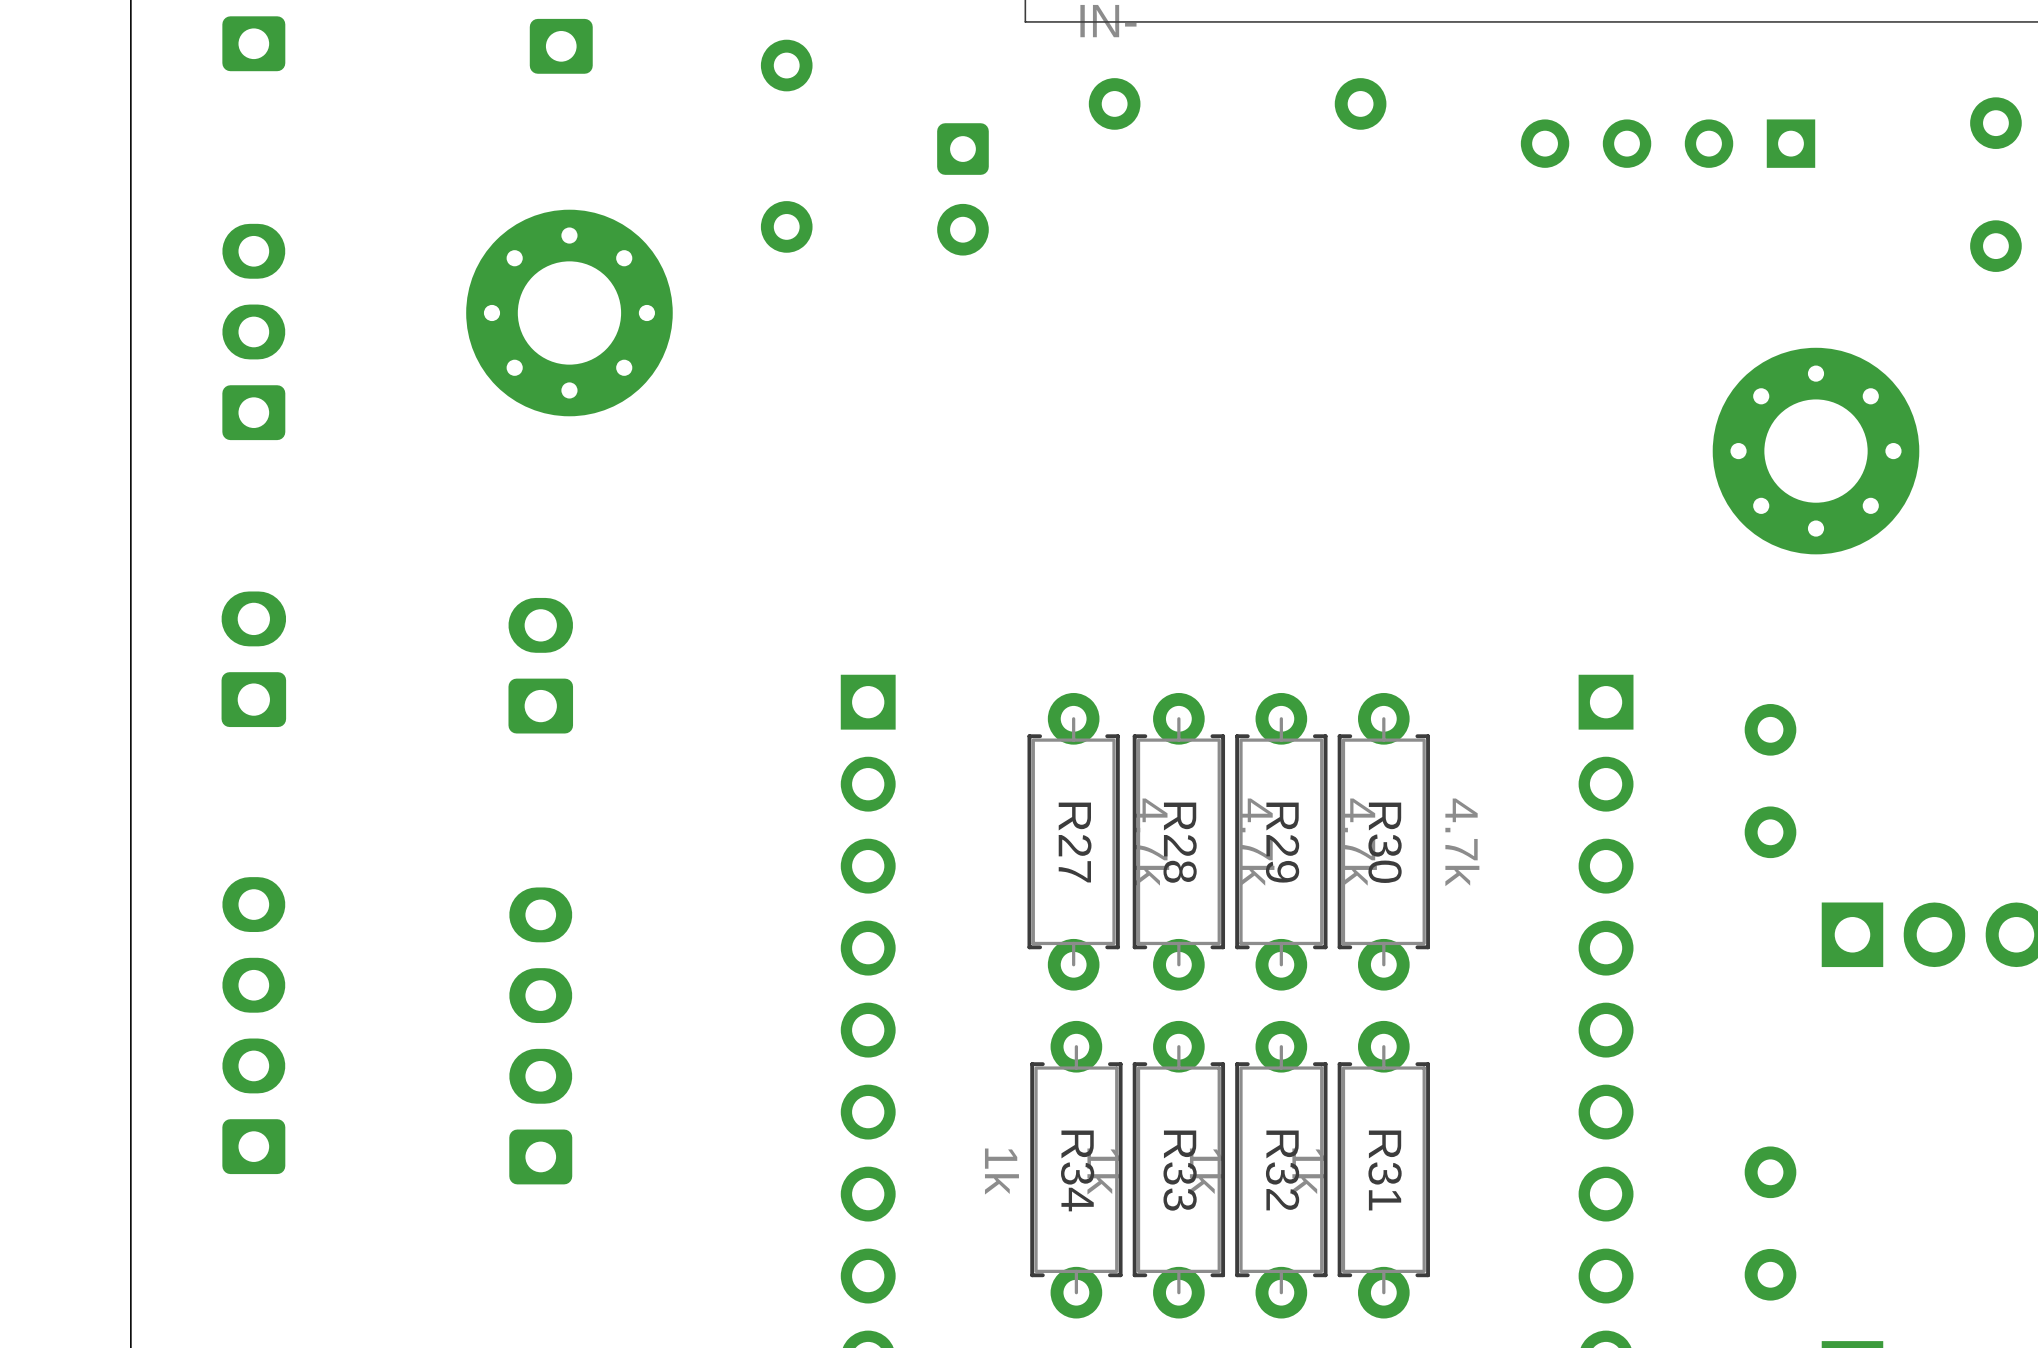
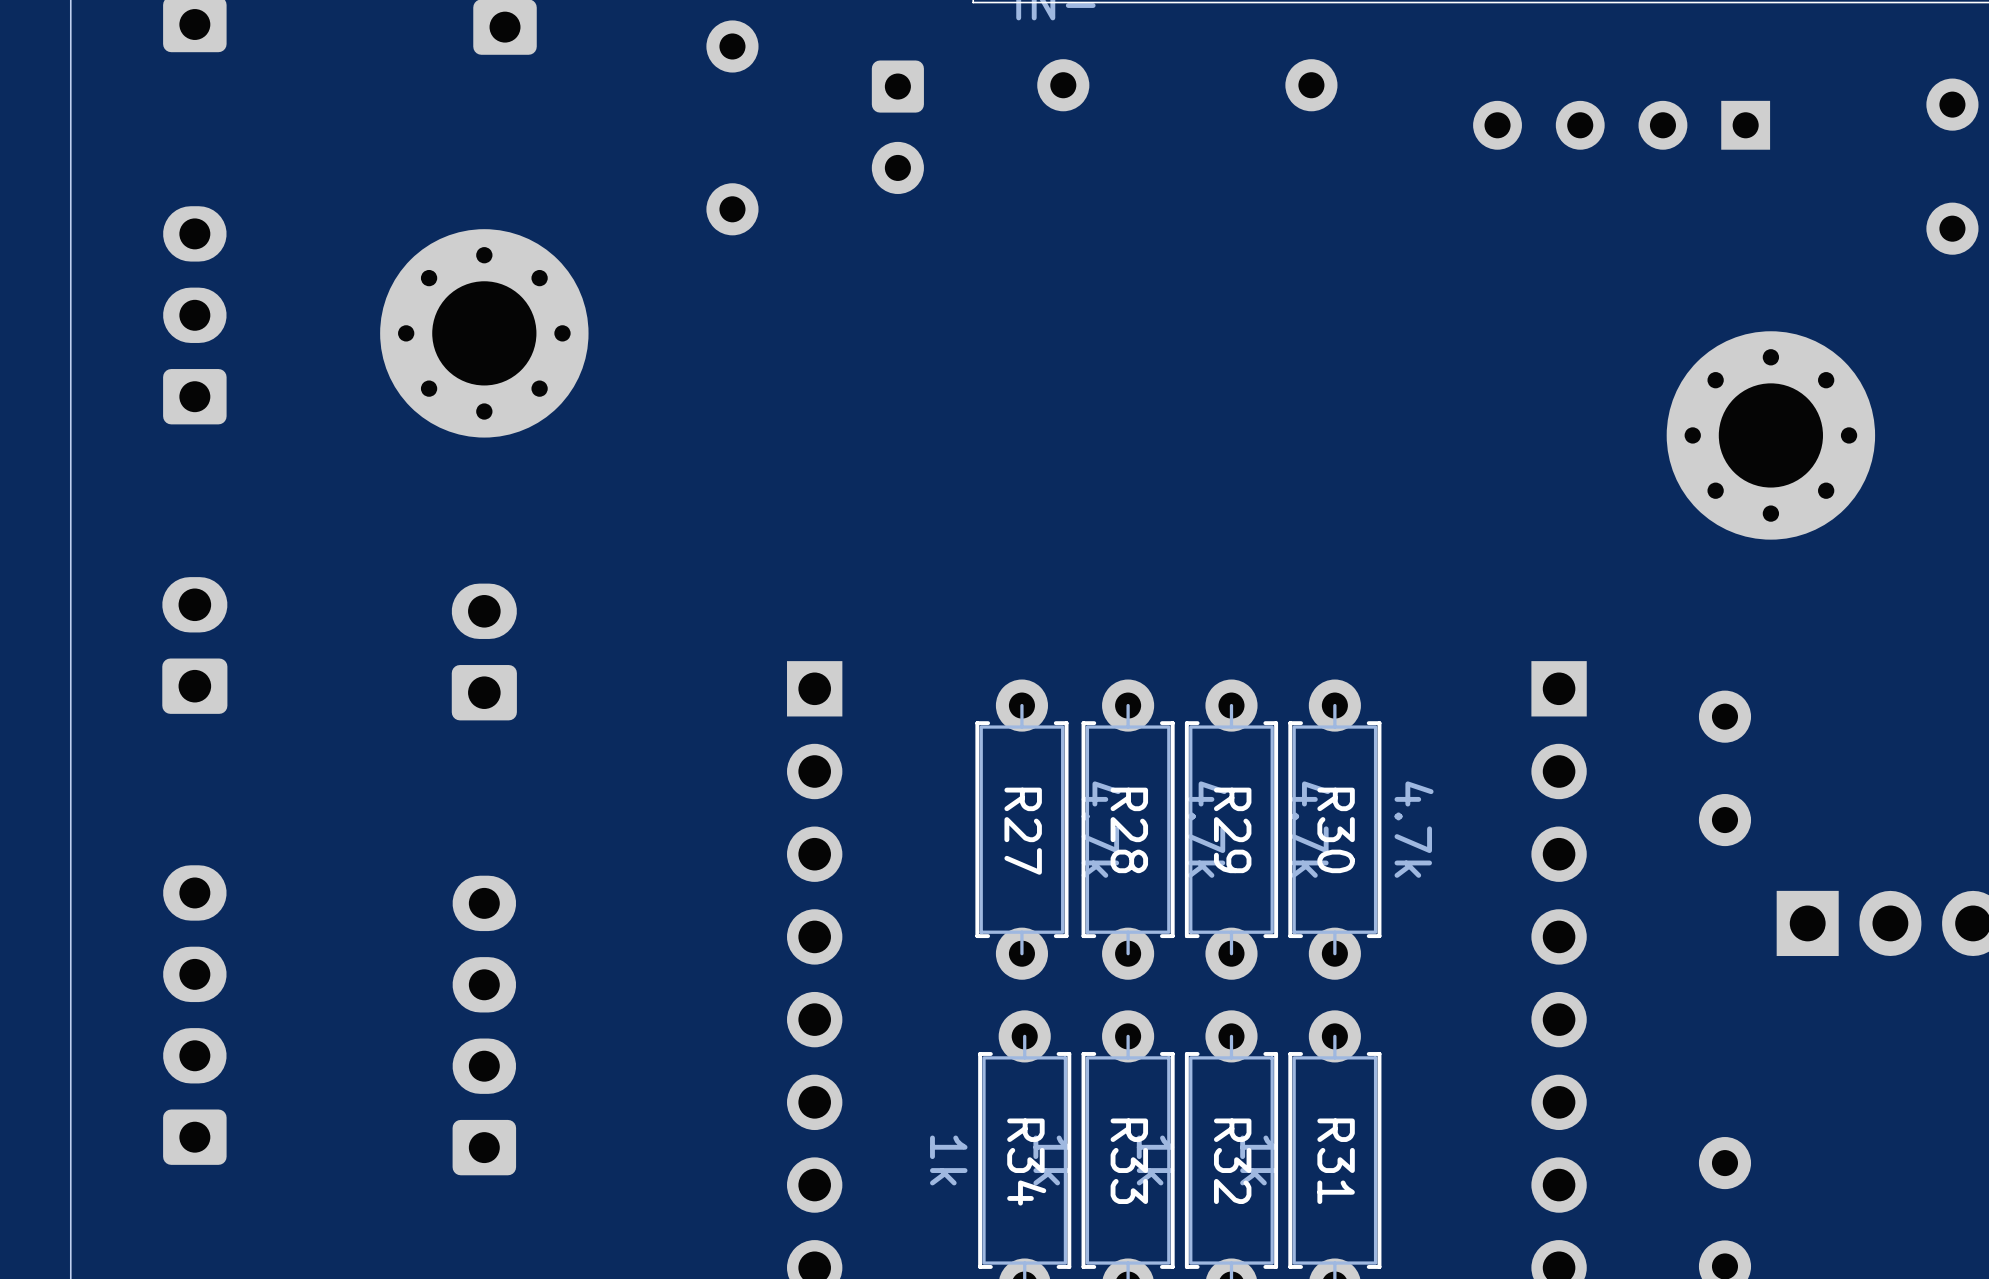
part position: (962, 189) -> (897, 127)
part position: (569, 313) -> (484, 333)

